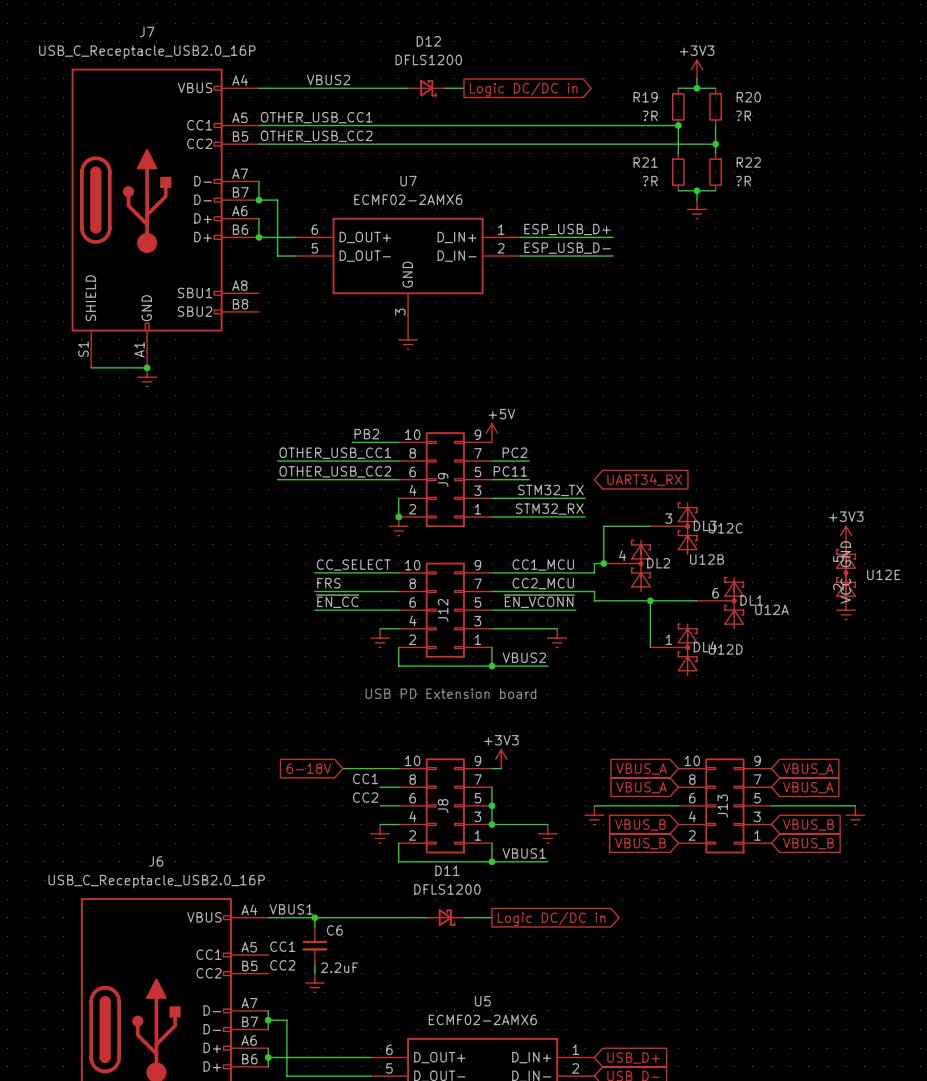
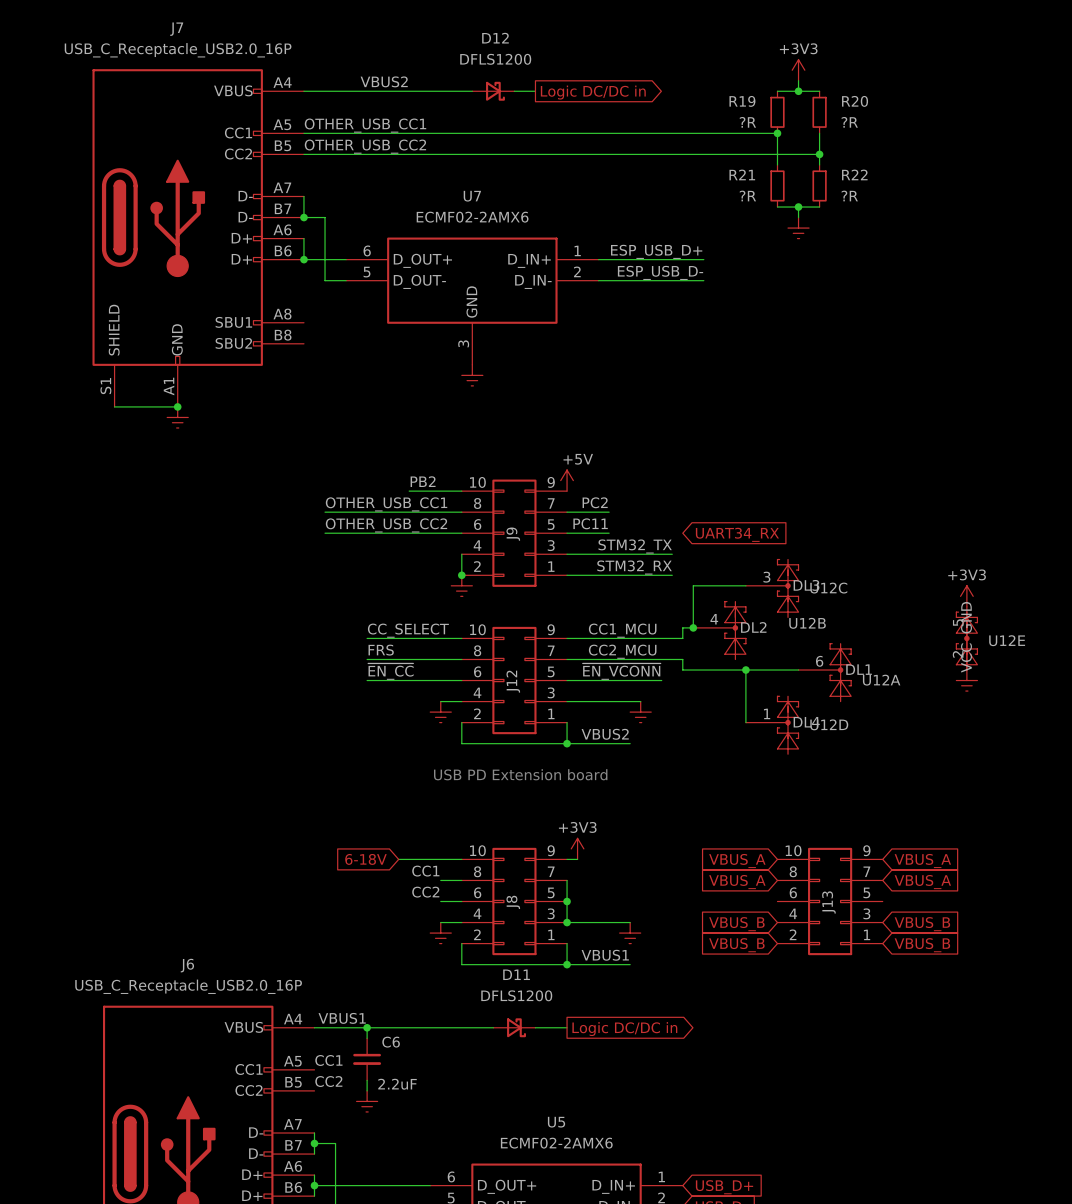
wire: (594, 805) (678, 805) -> none
wire: (771, 805) (855, 805) -> none
power symbol: (594, 815) -> none
power symbol: (855, 815) -> none

